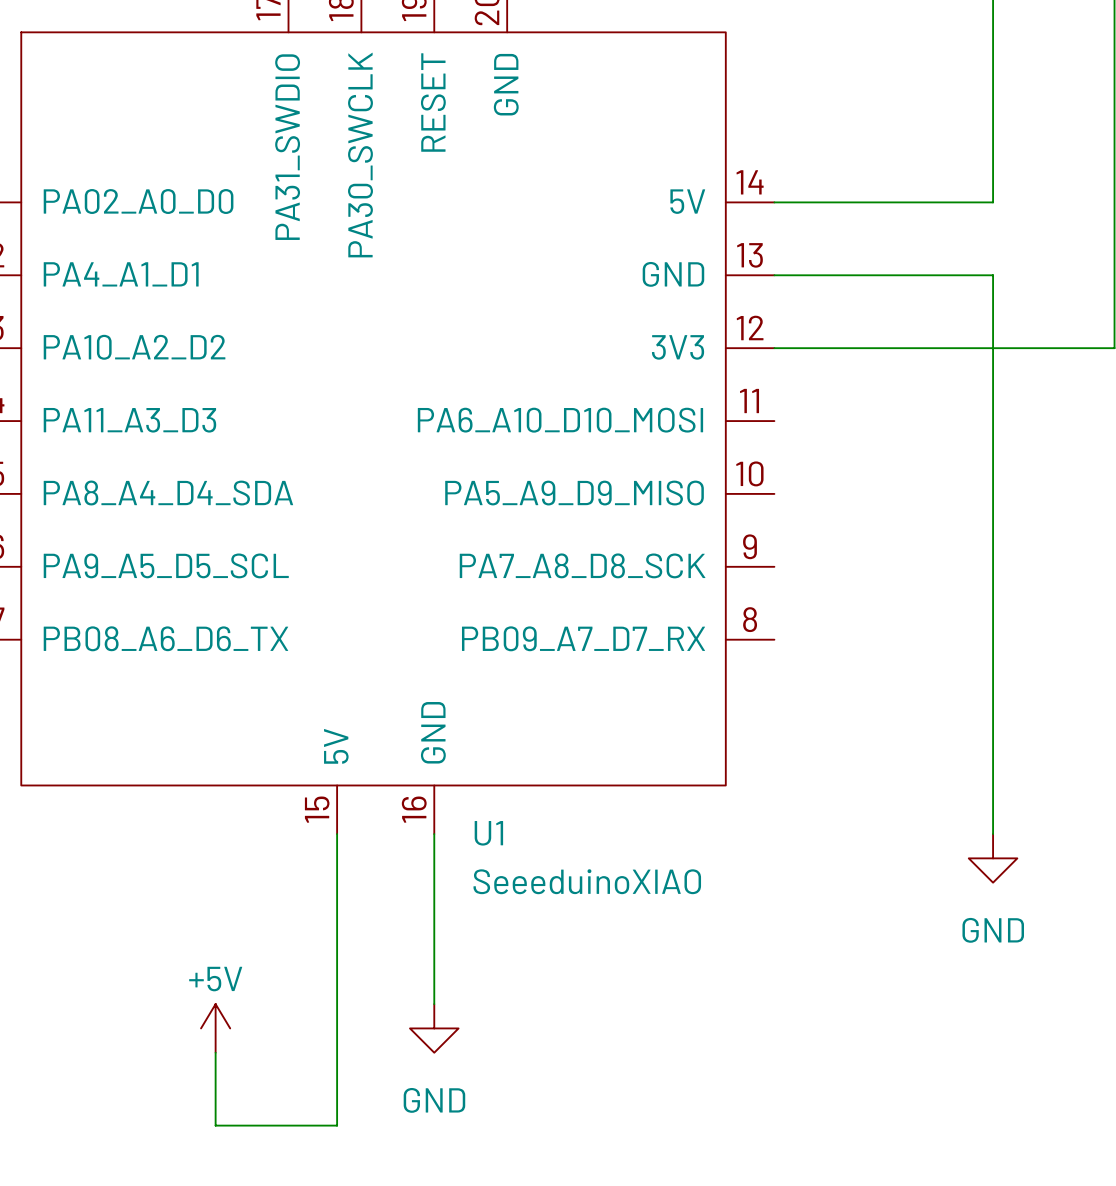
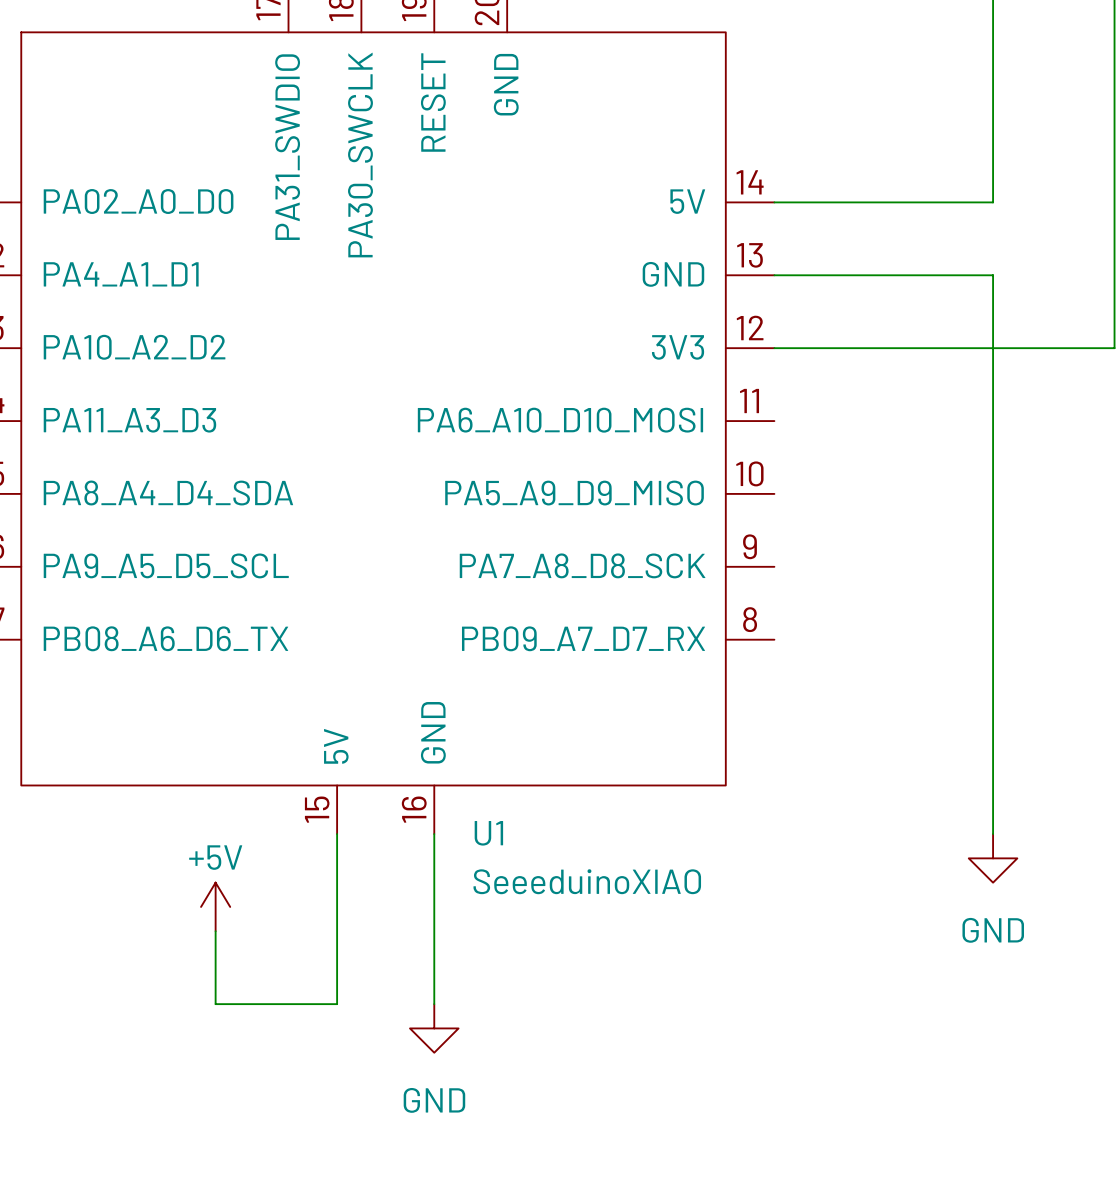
wire: (337, 1004) (337, 1125) (215, 1125) (215, 1052) -> (337, 1004) (215, 1004) (215, 931)
power symbol position: +5V (215, 1028) -> +5V (215, 906)

